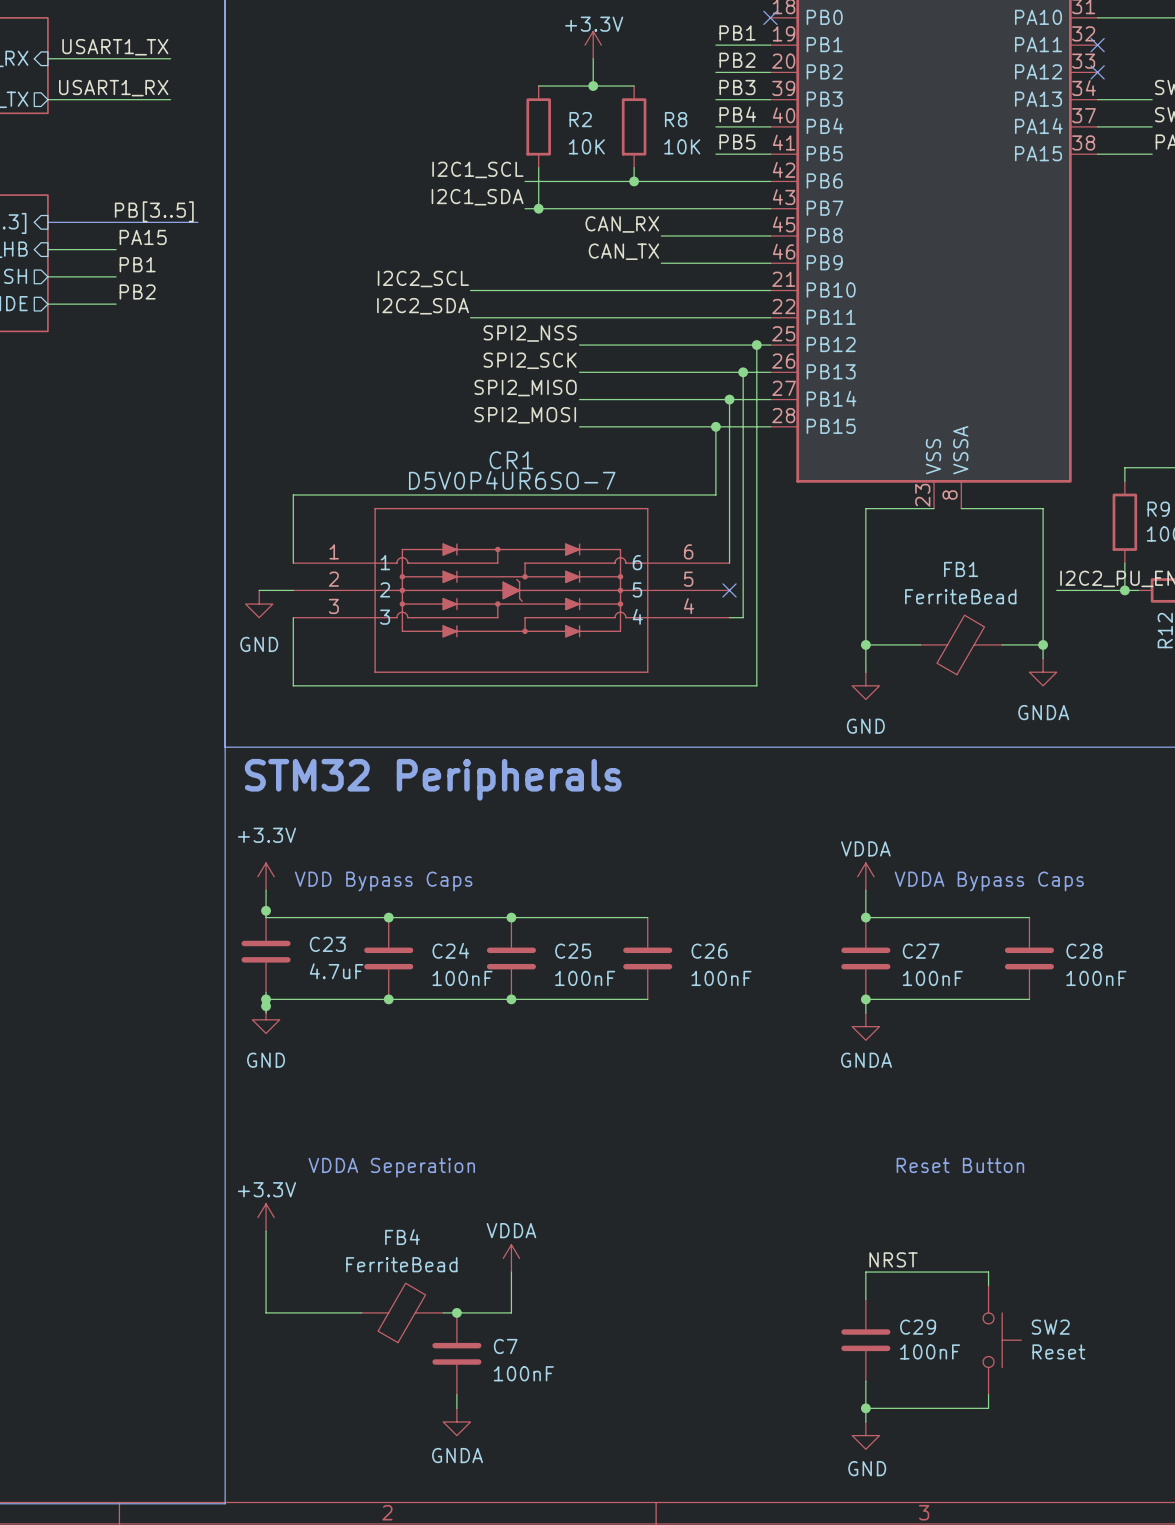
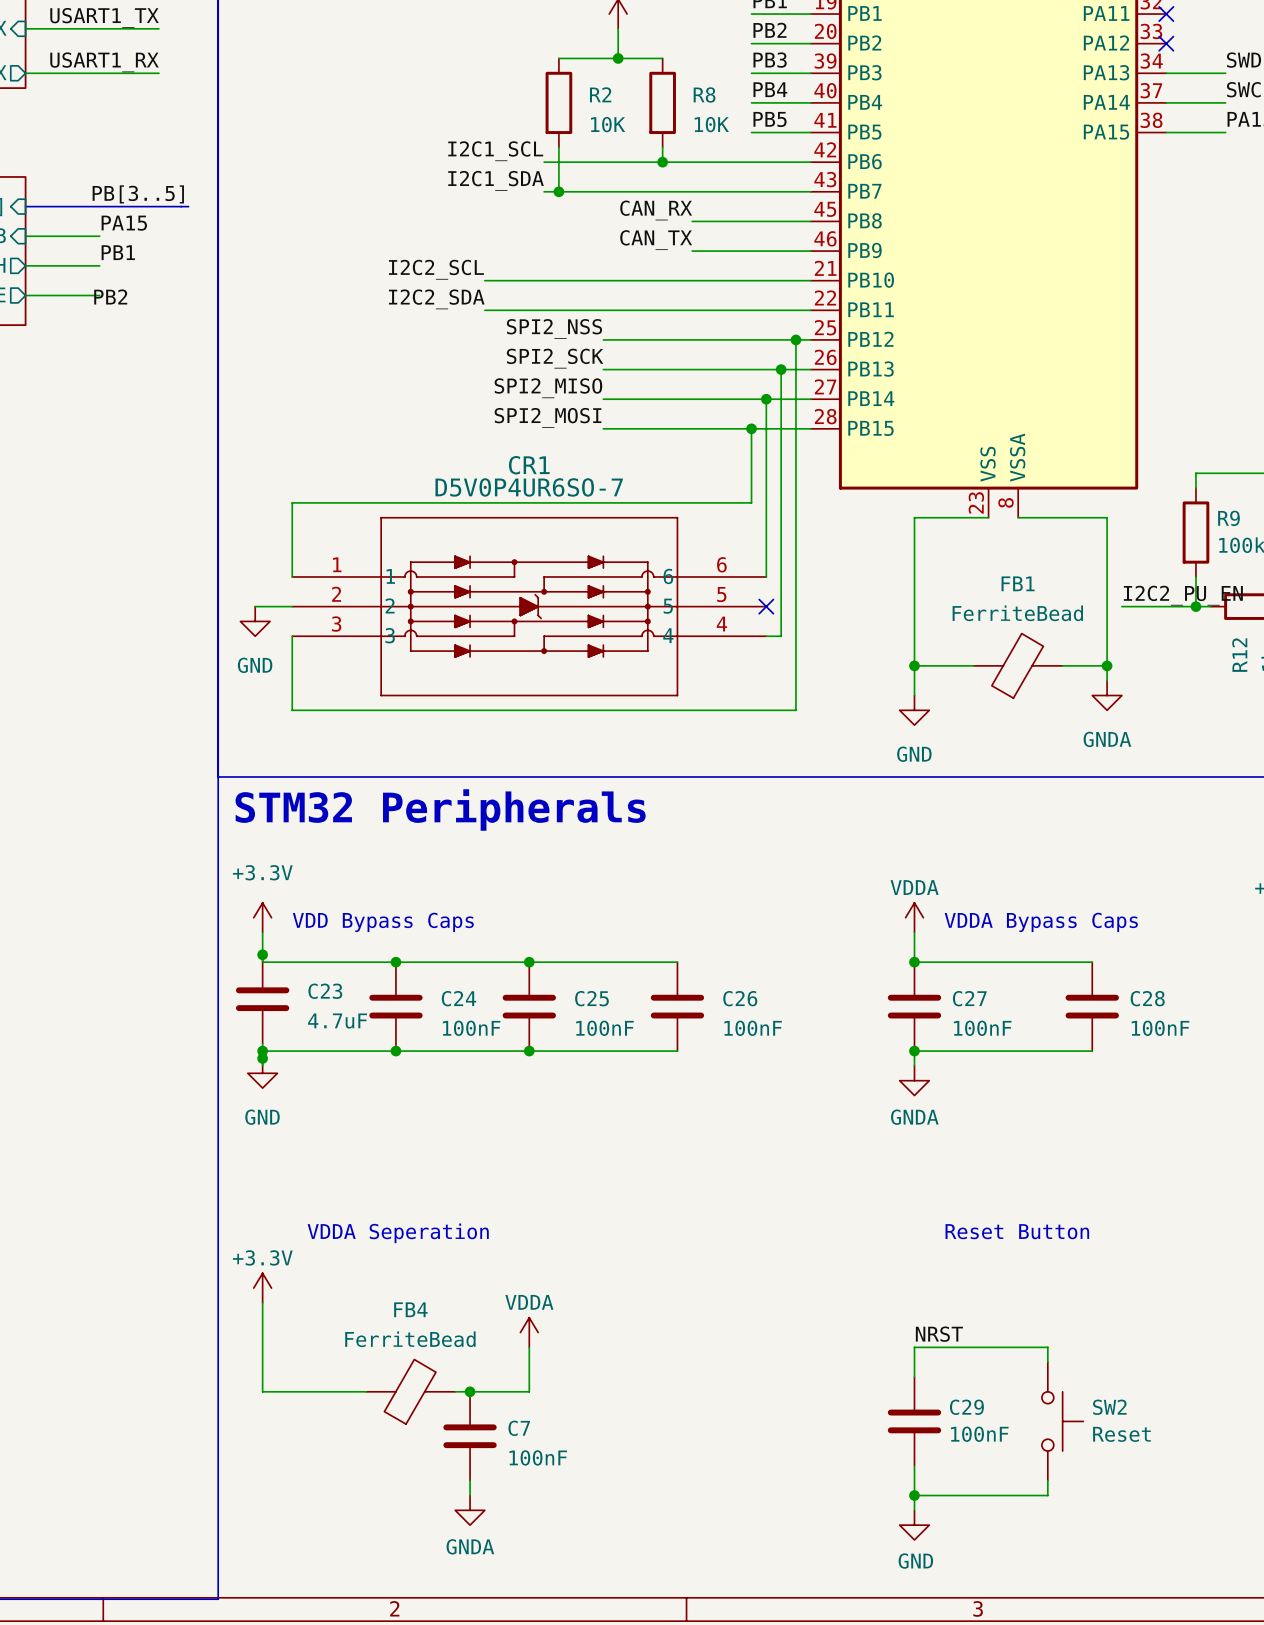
label position: PB2 (137, 291) -> PB2 (110, 296)

